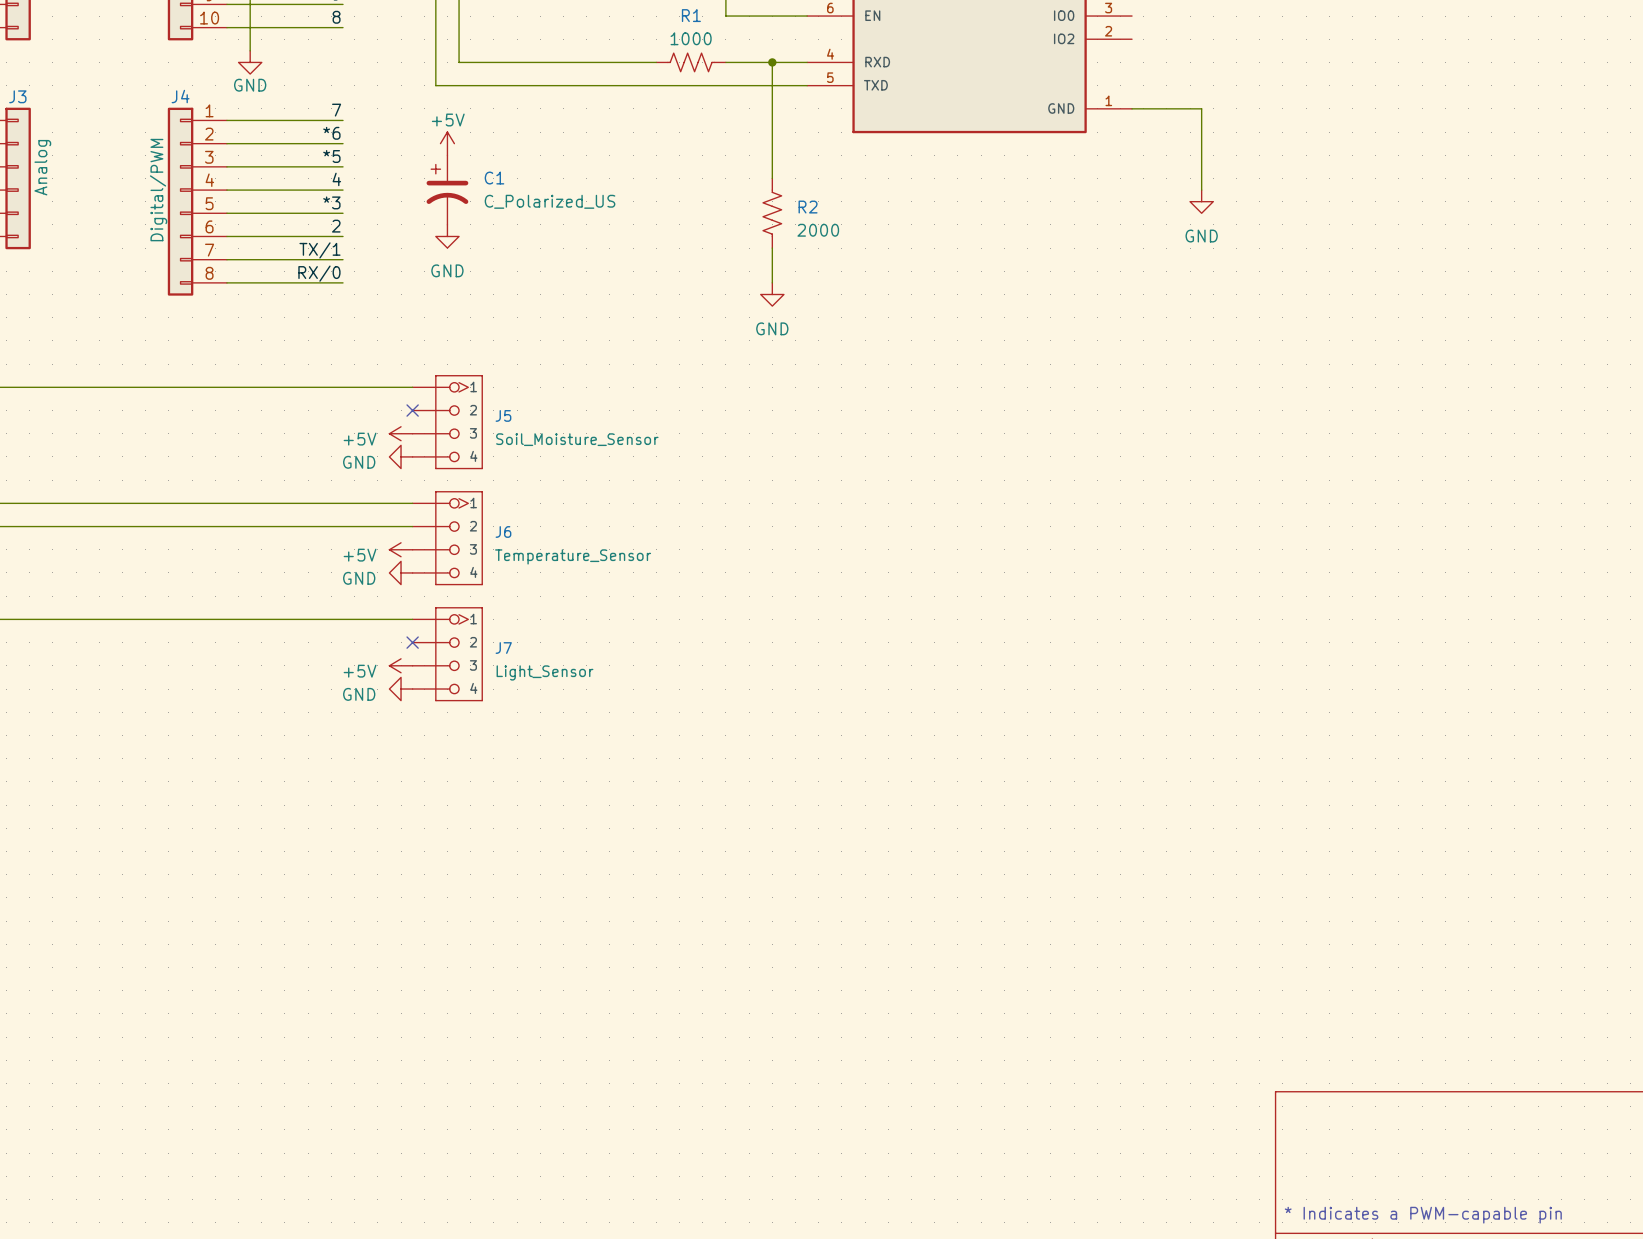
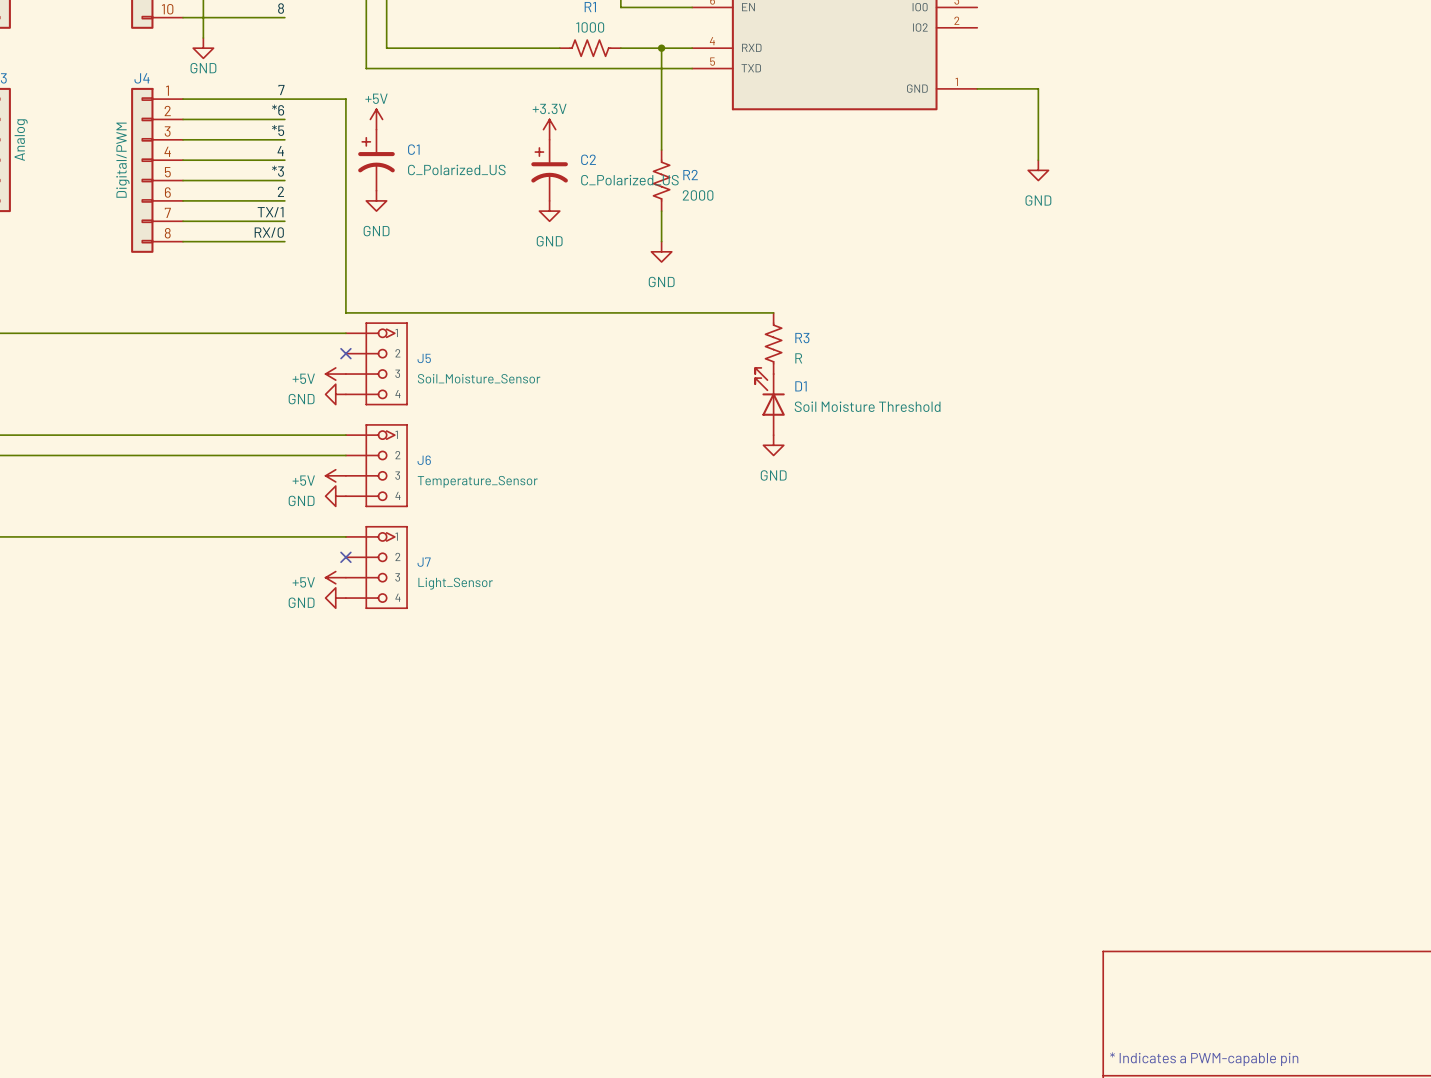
wire: none -> (284, 99) (345, 99) (345, 312) (773, 312)
power symbol: none -> +3.3V (549, 129)
C2: none -> C_Polarized_US (549, 170)
power symbol: none -> GND (549, 211)
R3: none -> R (773, 343)
D1: none -> Soil Moisture Threshold (770, 401)
power symbol: none -> GND (773, 445)

